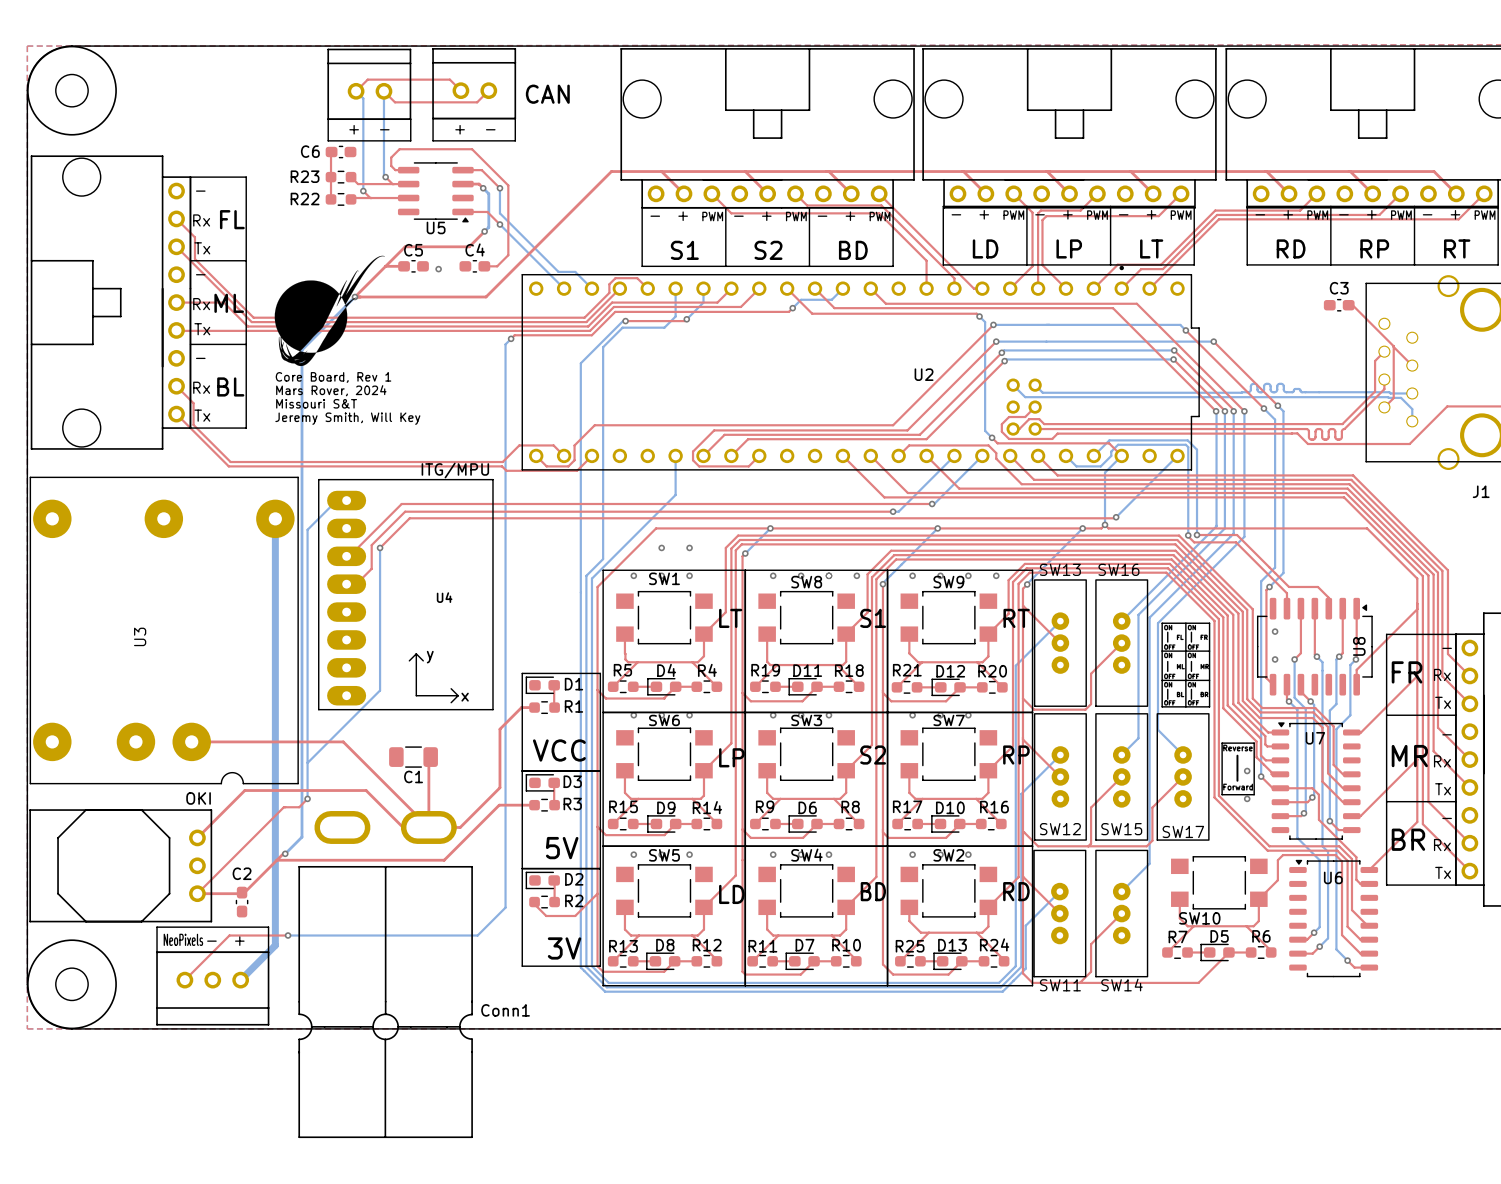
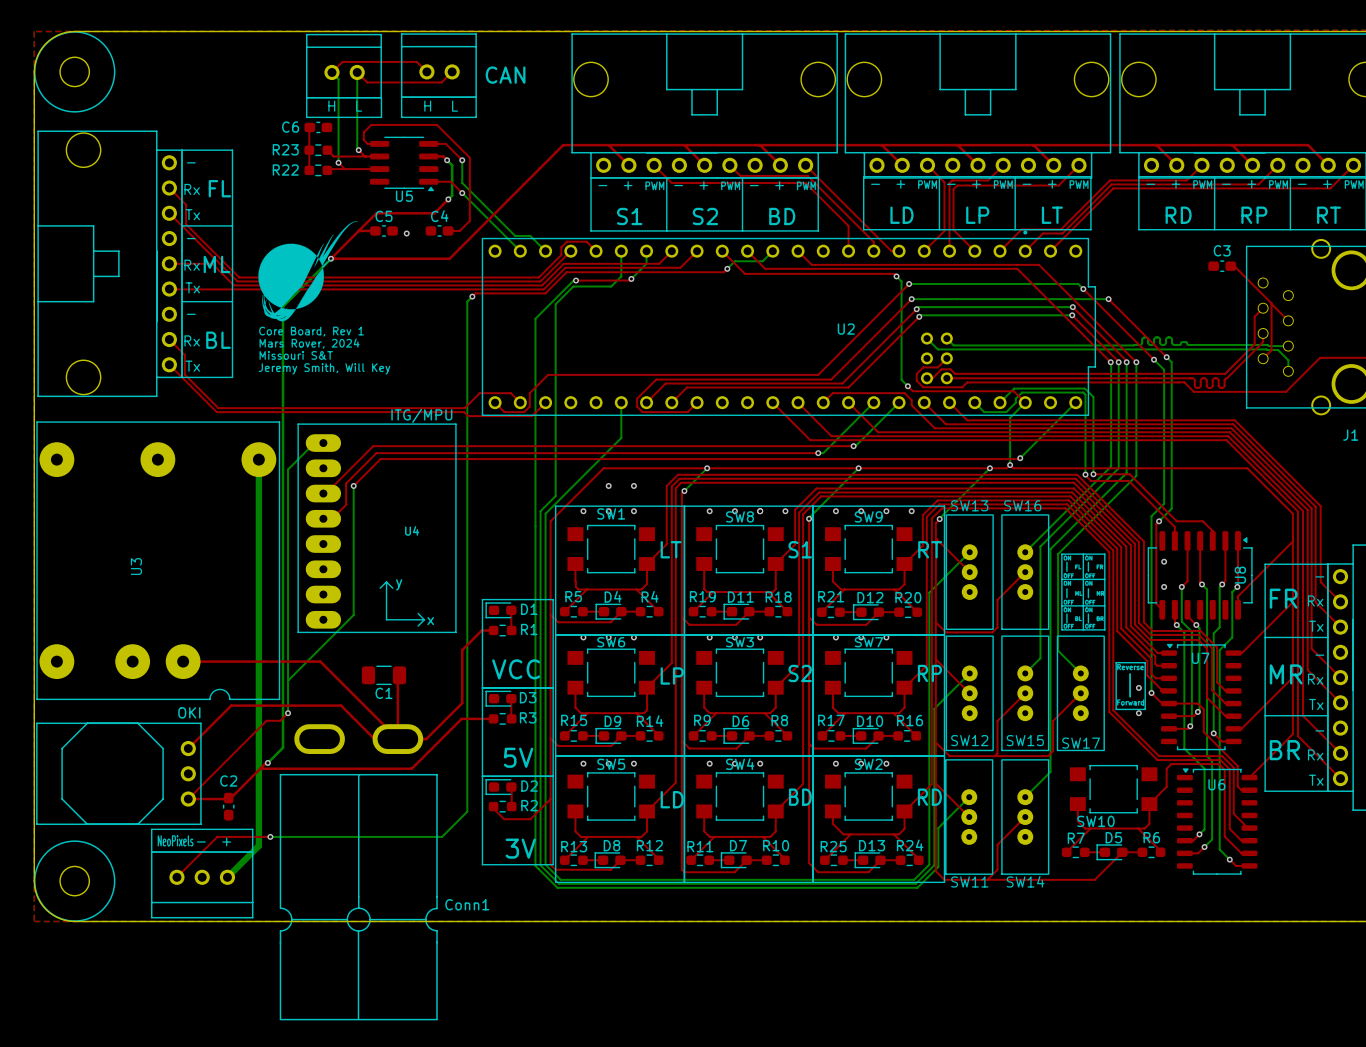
text: + (354, 129) -> H (331, 106)
text: - (384, 129) -> L (359, 106)
text: + (460, 129) -> H (427, 106)
text: - (490, 129) -> L (455, 106)

